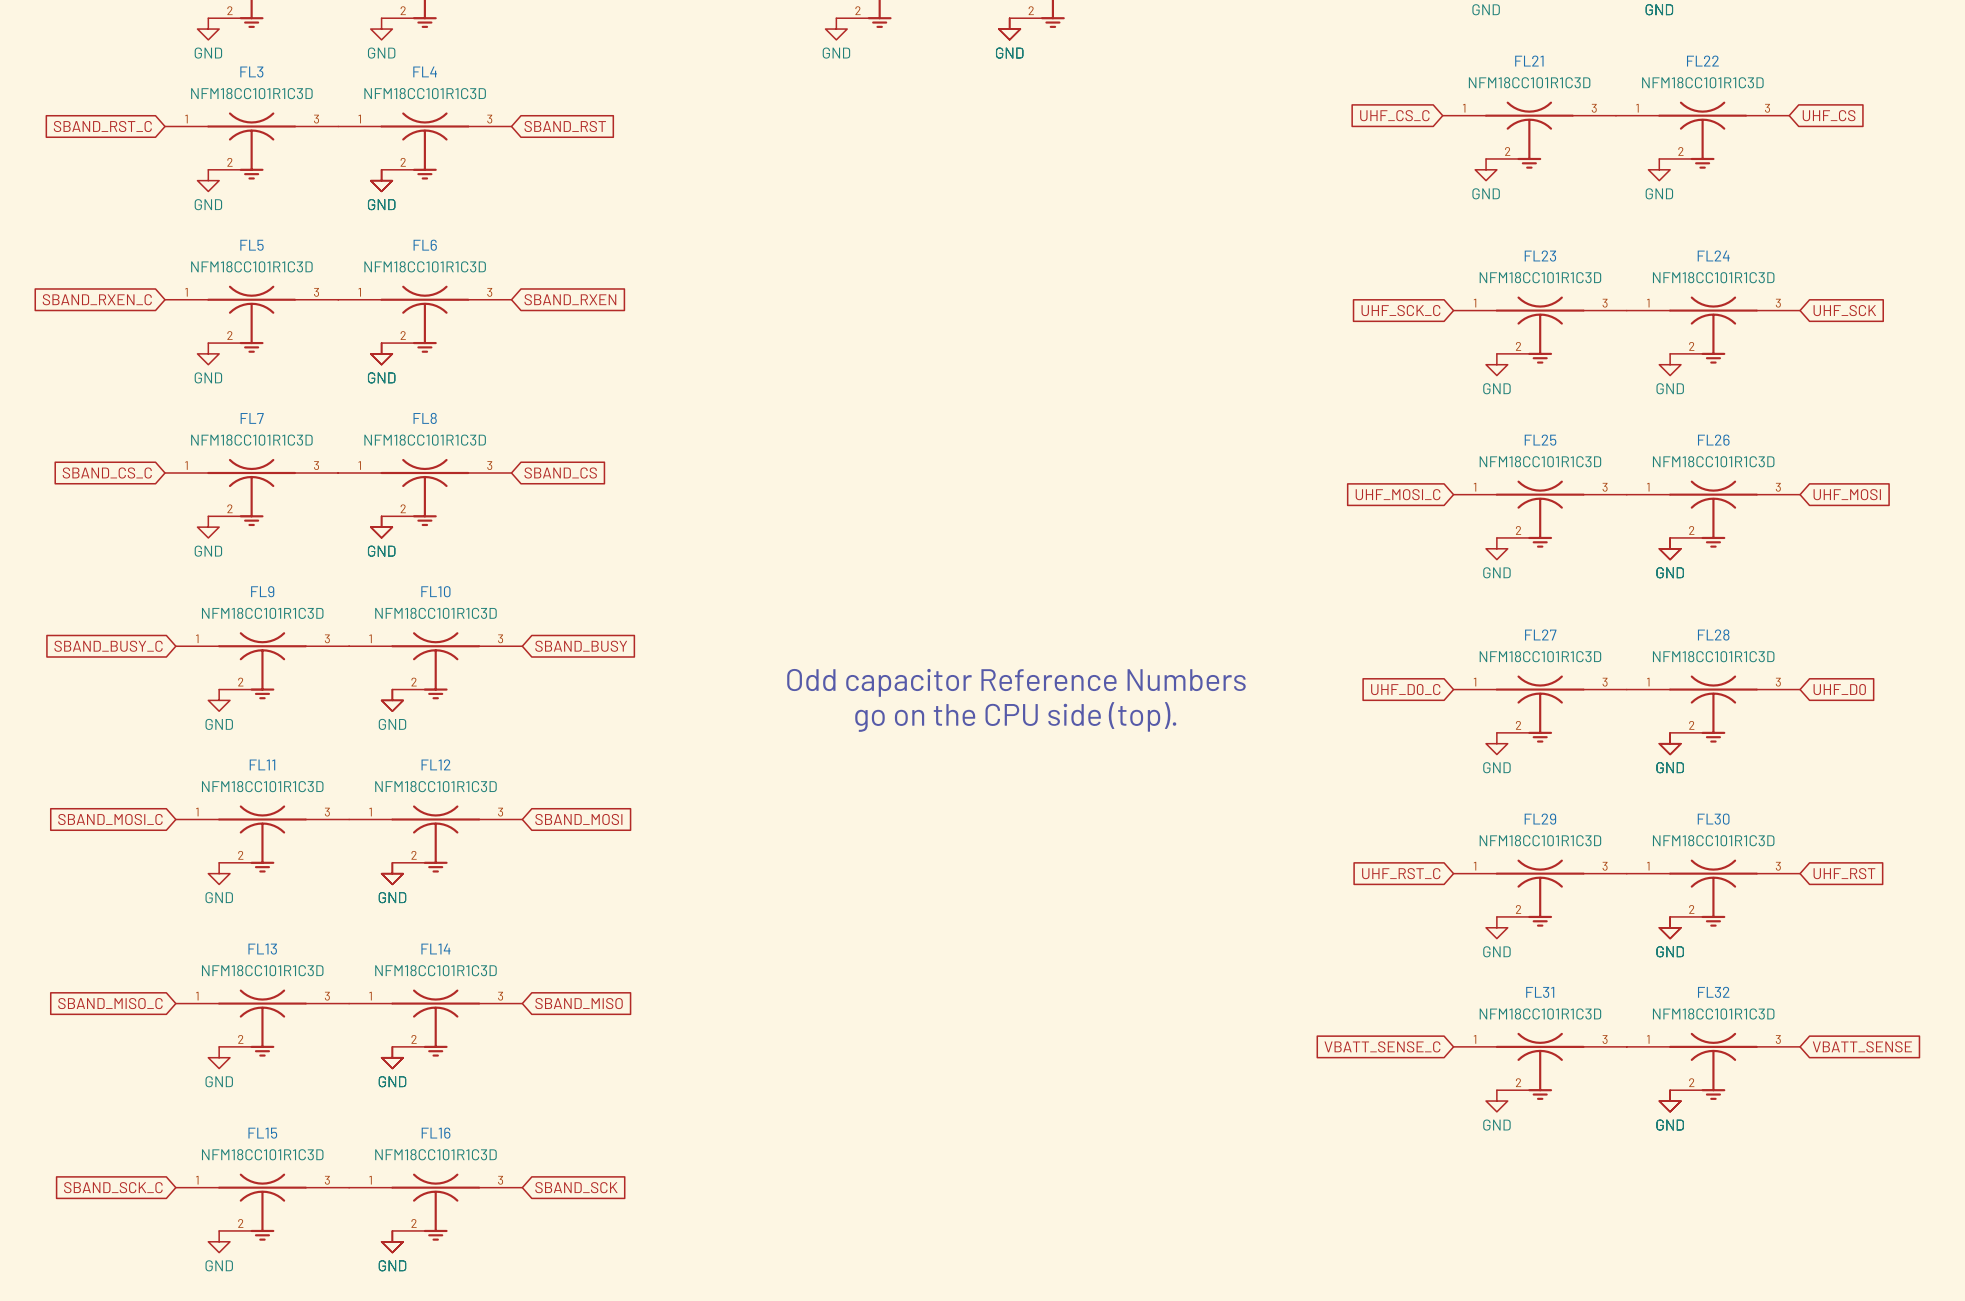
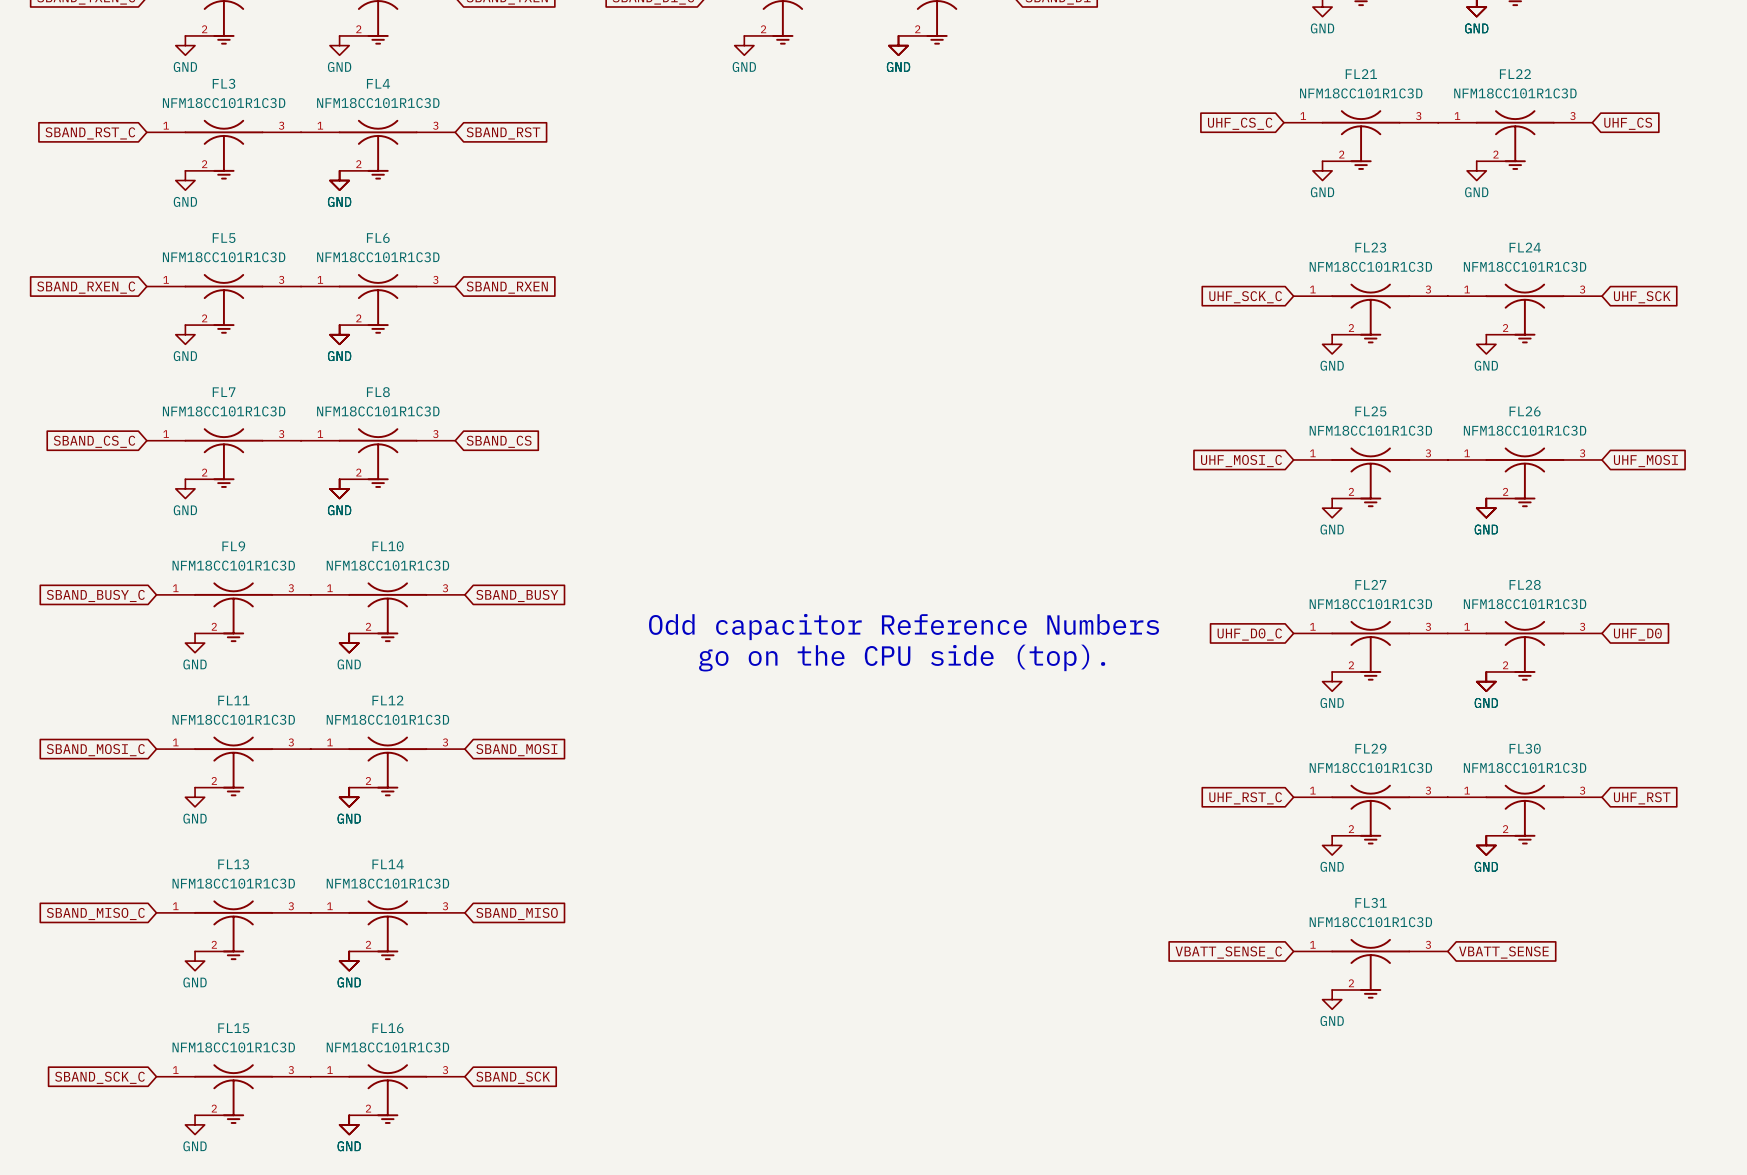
global label position: VBATT_SENSE (1862, 1046) -> VBATT_SENSE (1503, 952)
FL32: NFM18CC101R1C3D (1713, 1066) -> none
power symbol: GND (1670, 1101) -> none

